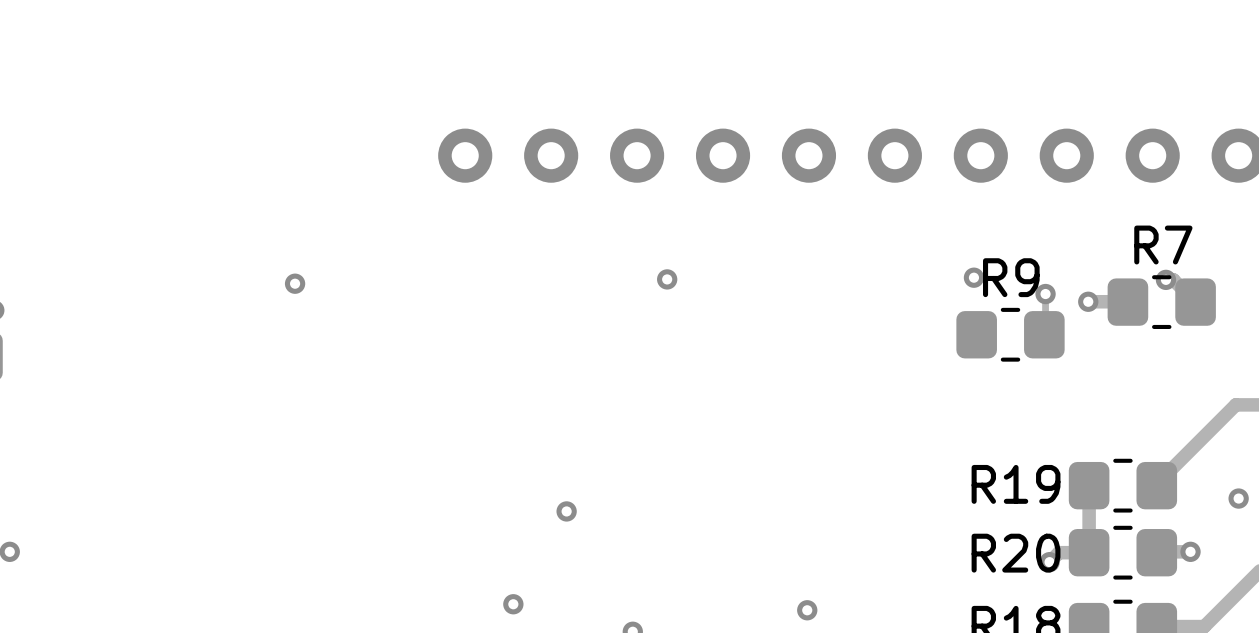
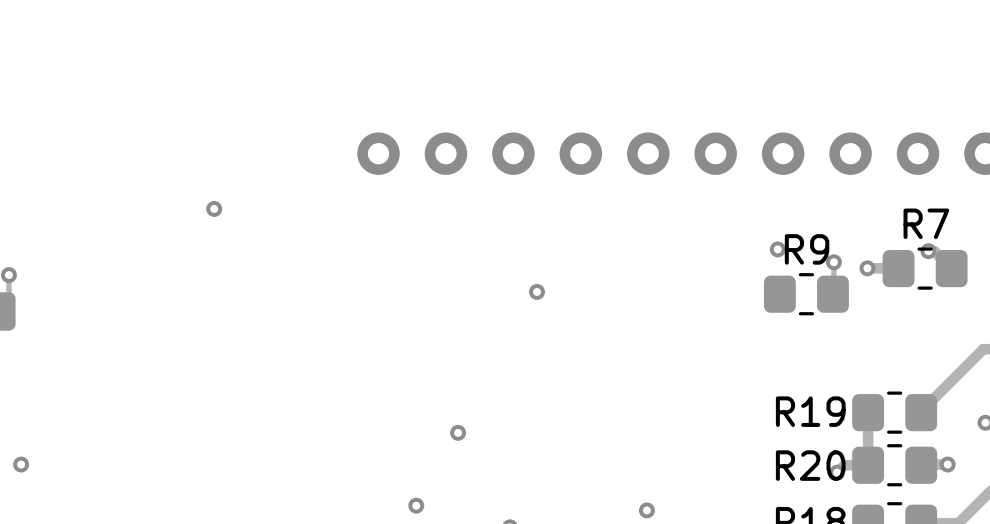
via position: (667, 279) -> (537, 291)
via position: (295, 283) -> (214, 208)

